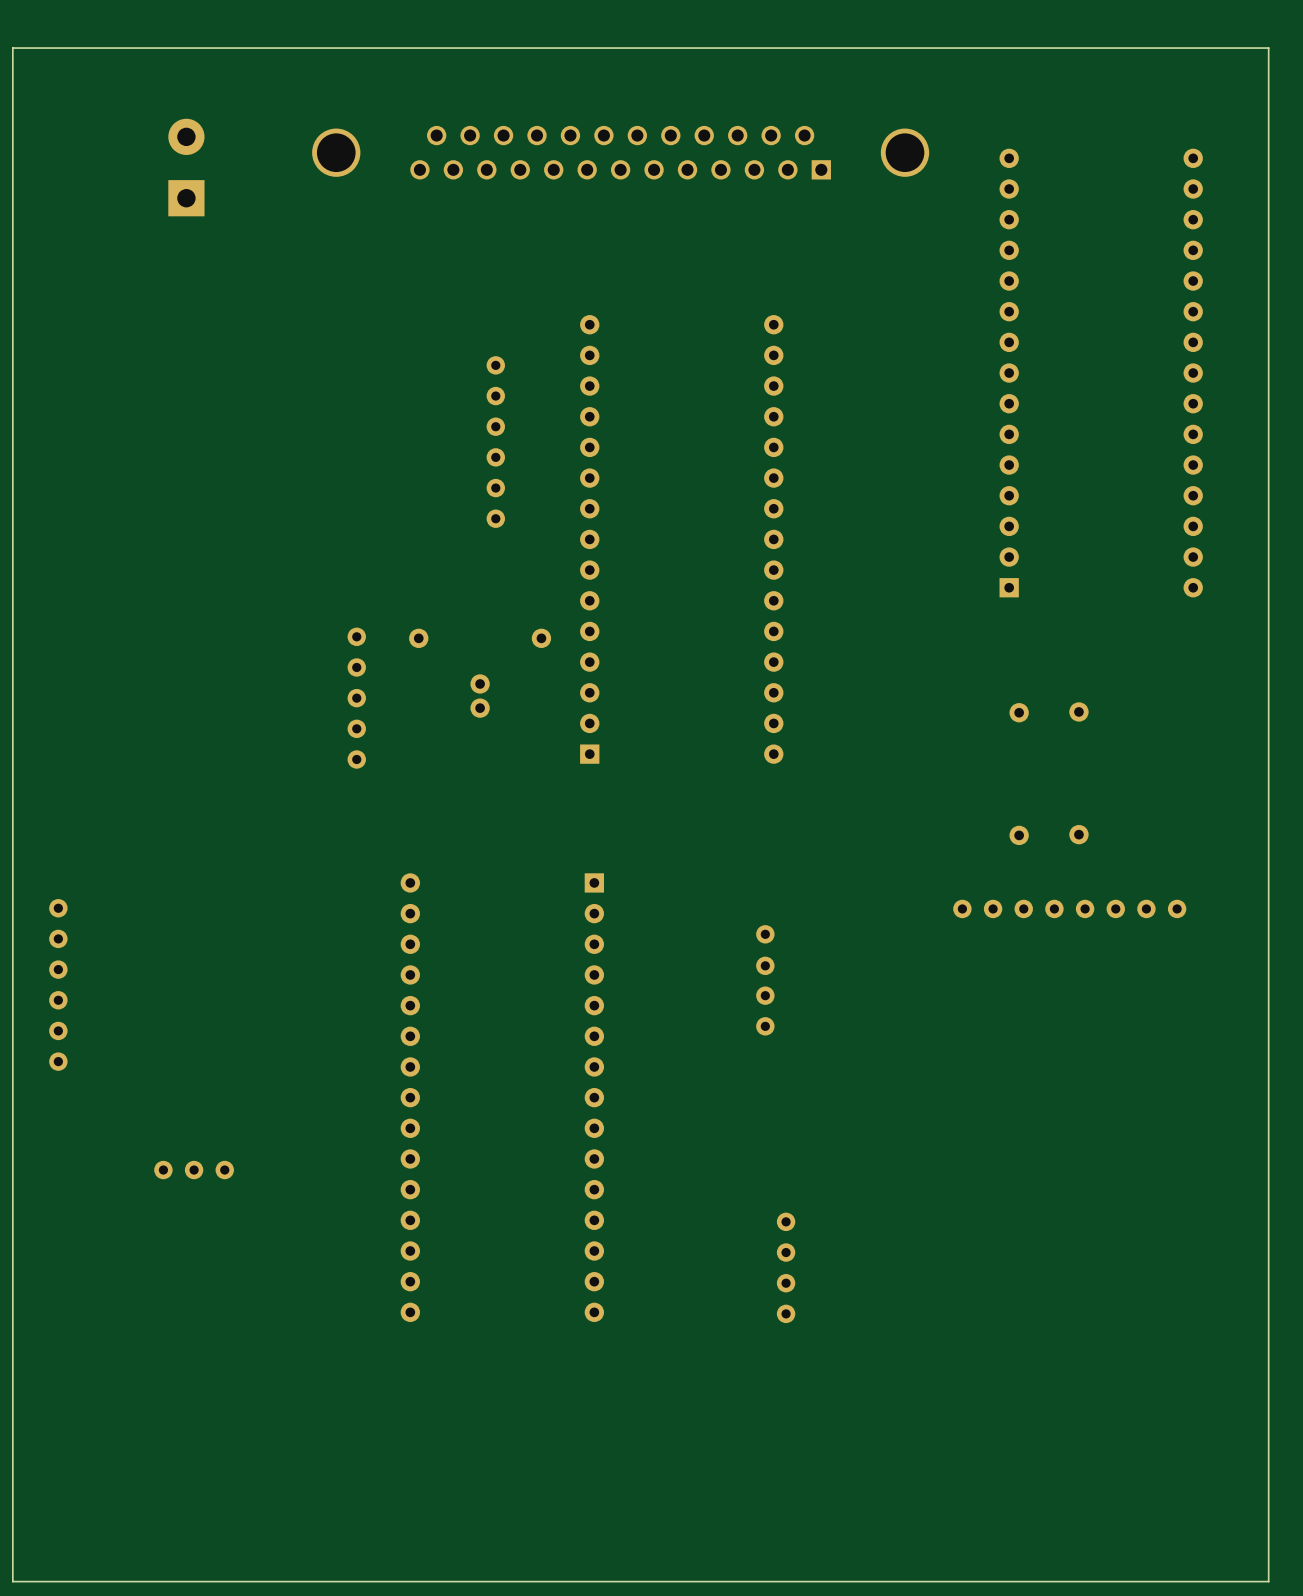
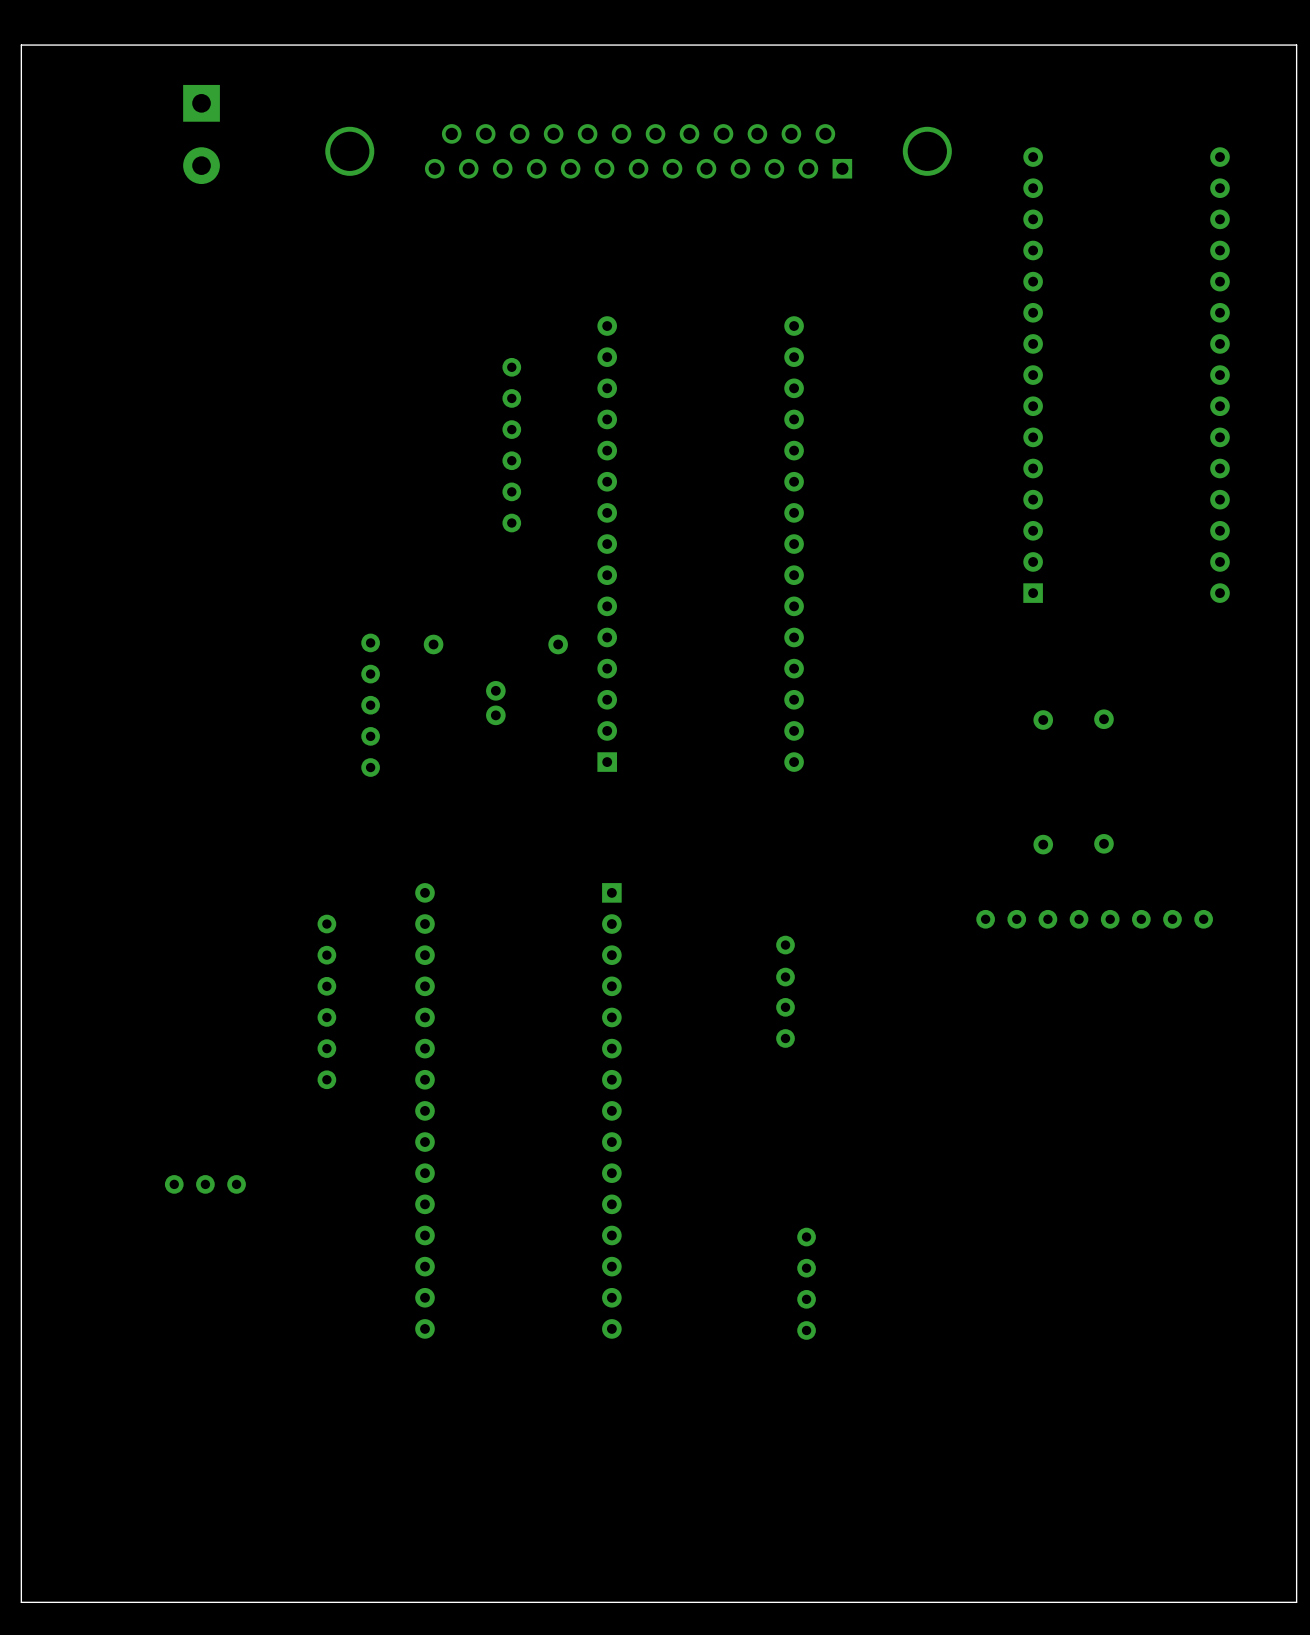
part rotation: 0° (186, 167) -> 180° (201, 134)
part position: (58, 984) -> (326, 1001)

